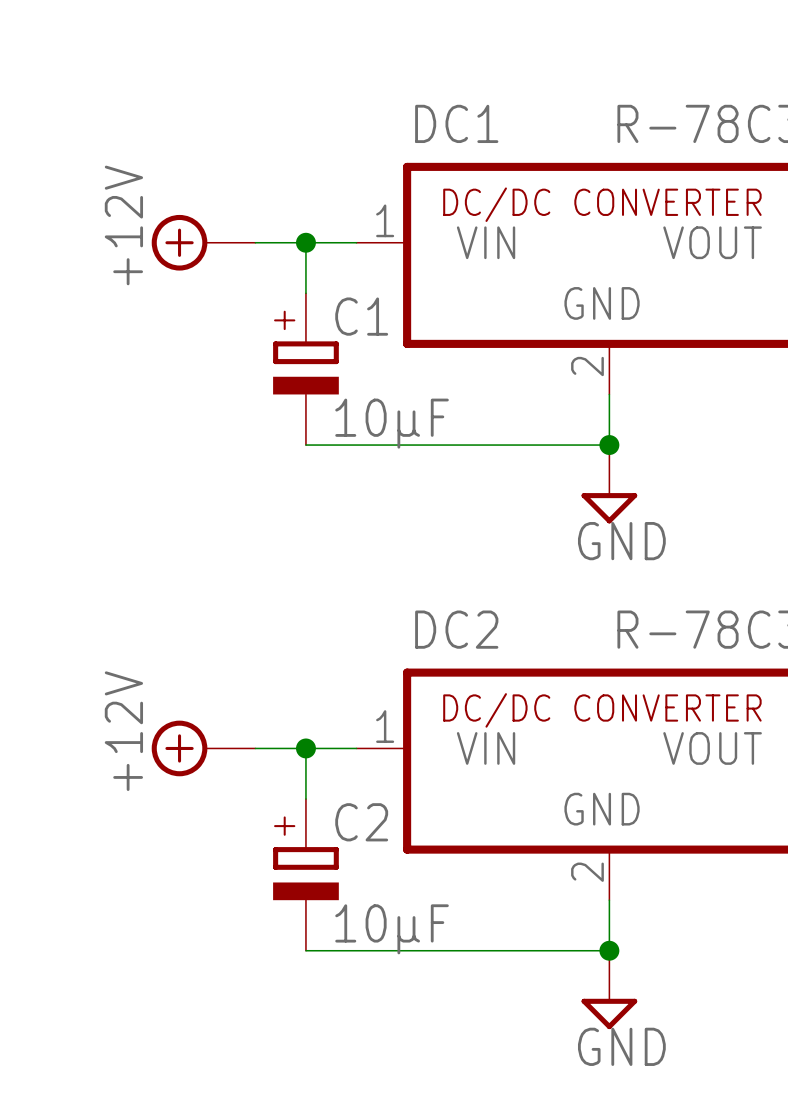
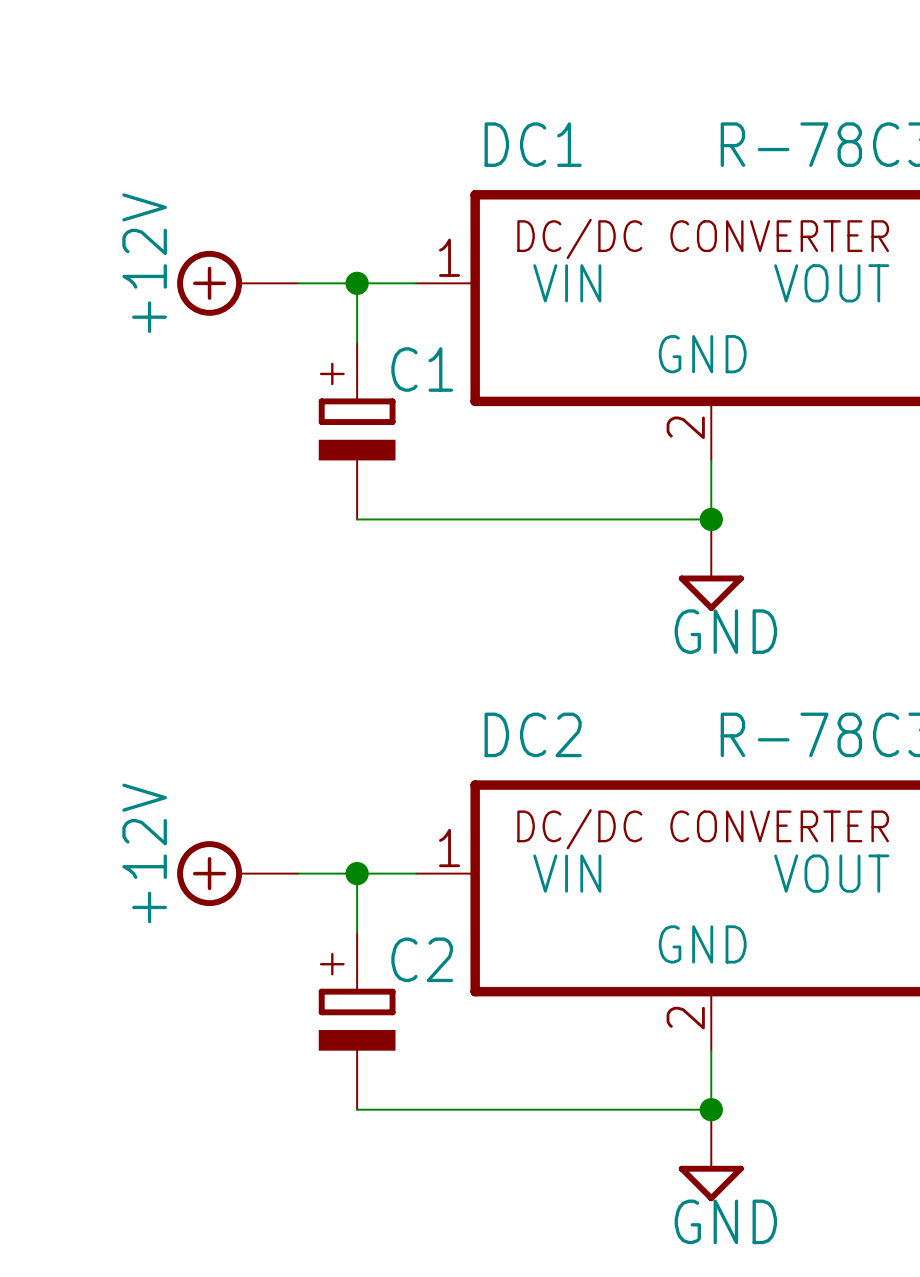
C1 value: 10µF (392, 423) -> none
C2 value: 10µF (392, 929) -> none

